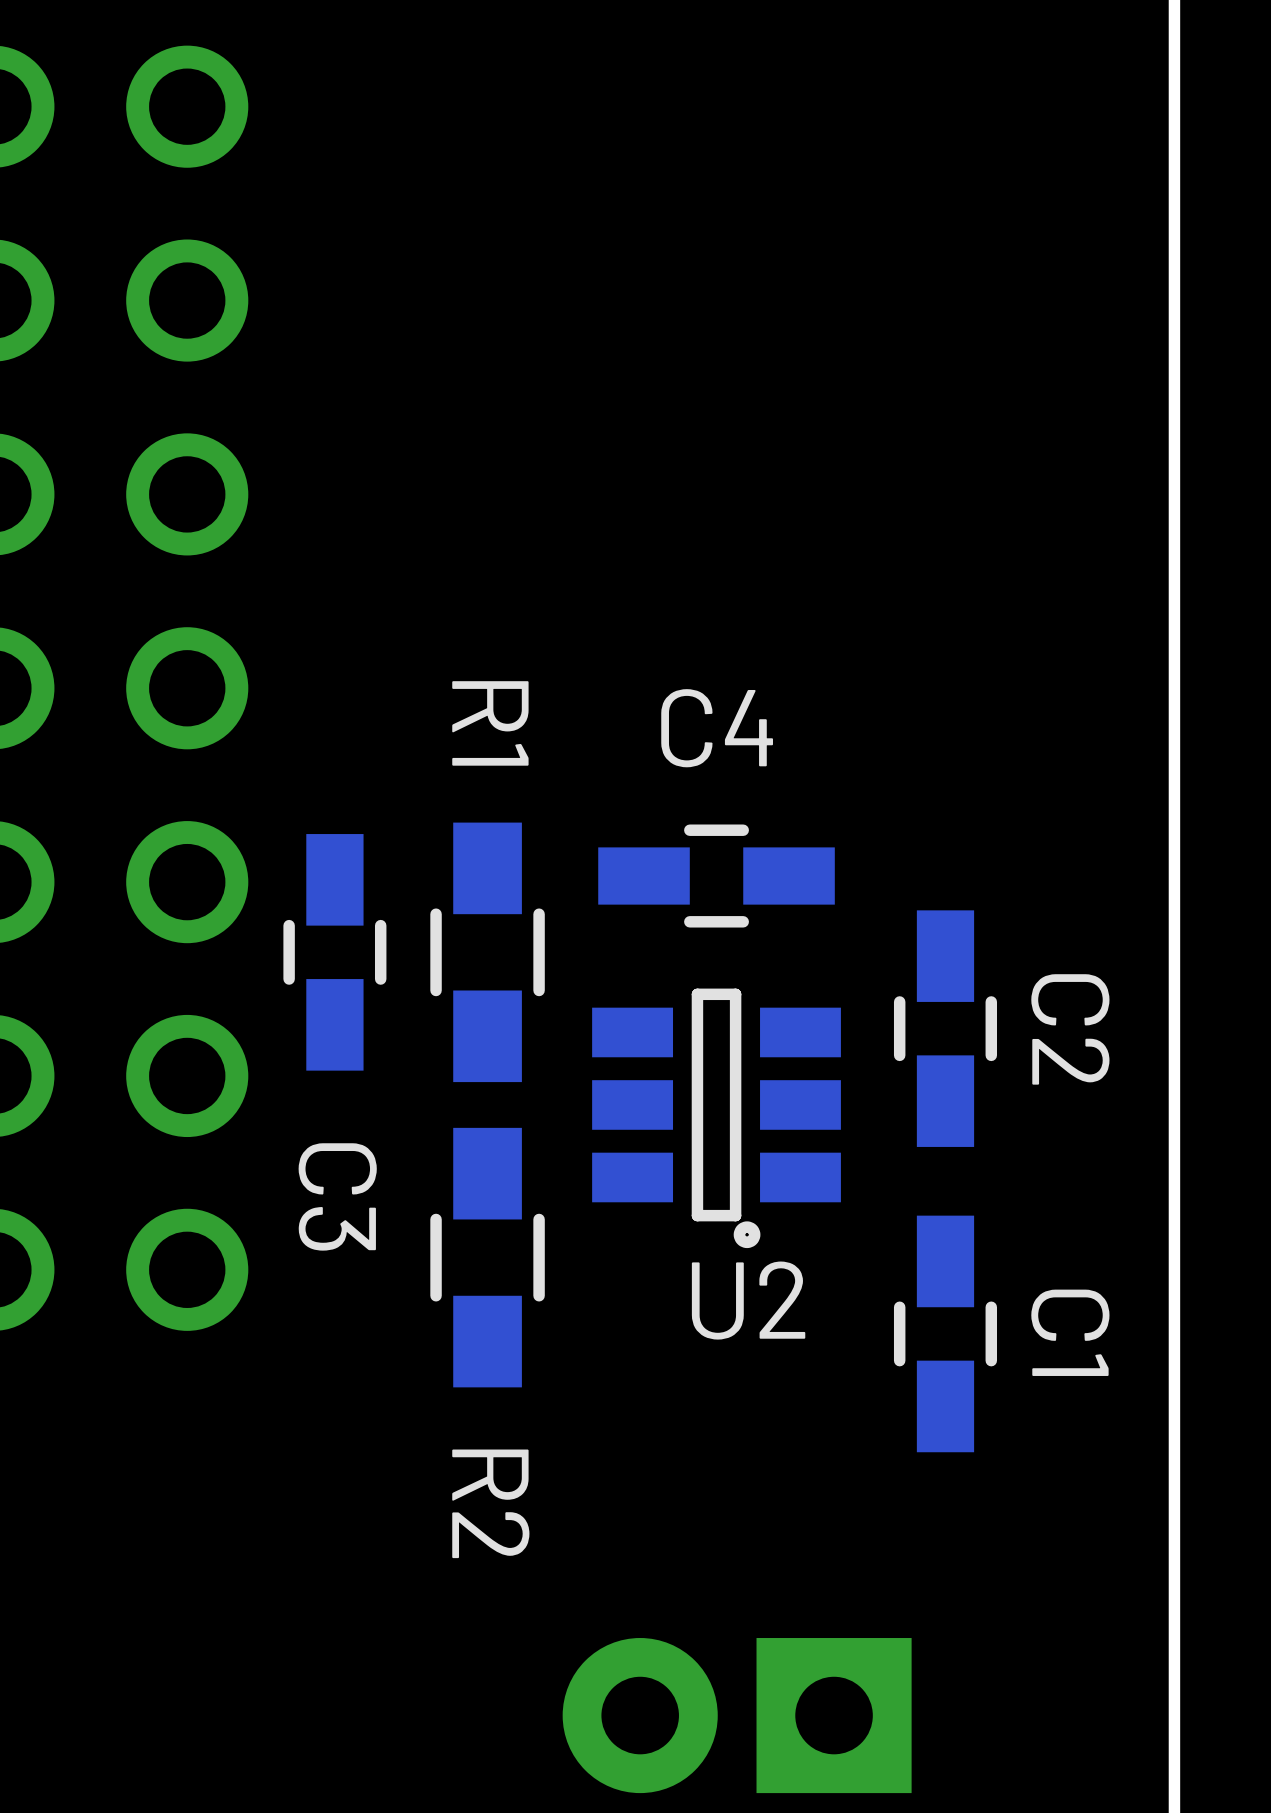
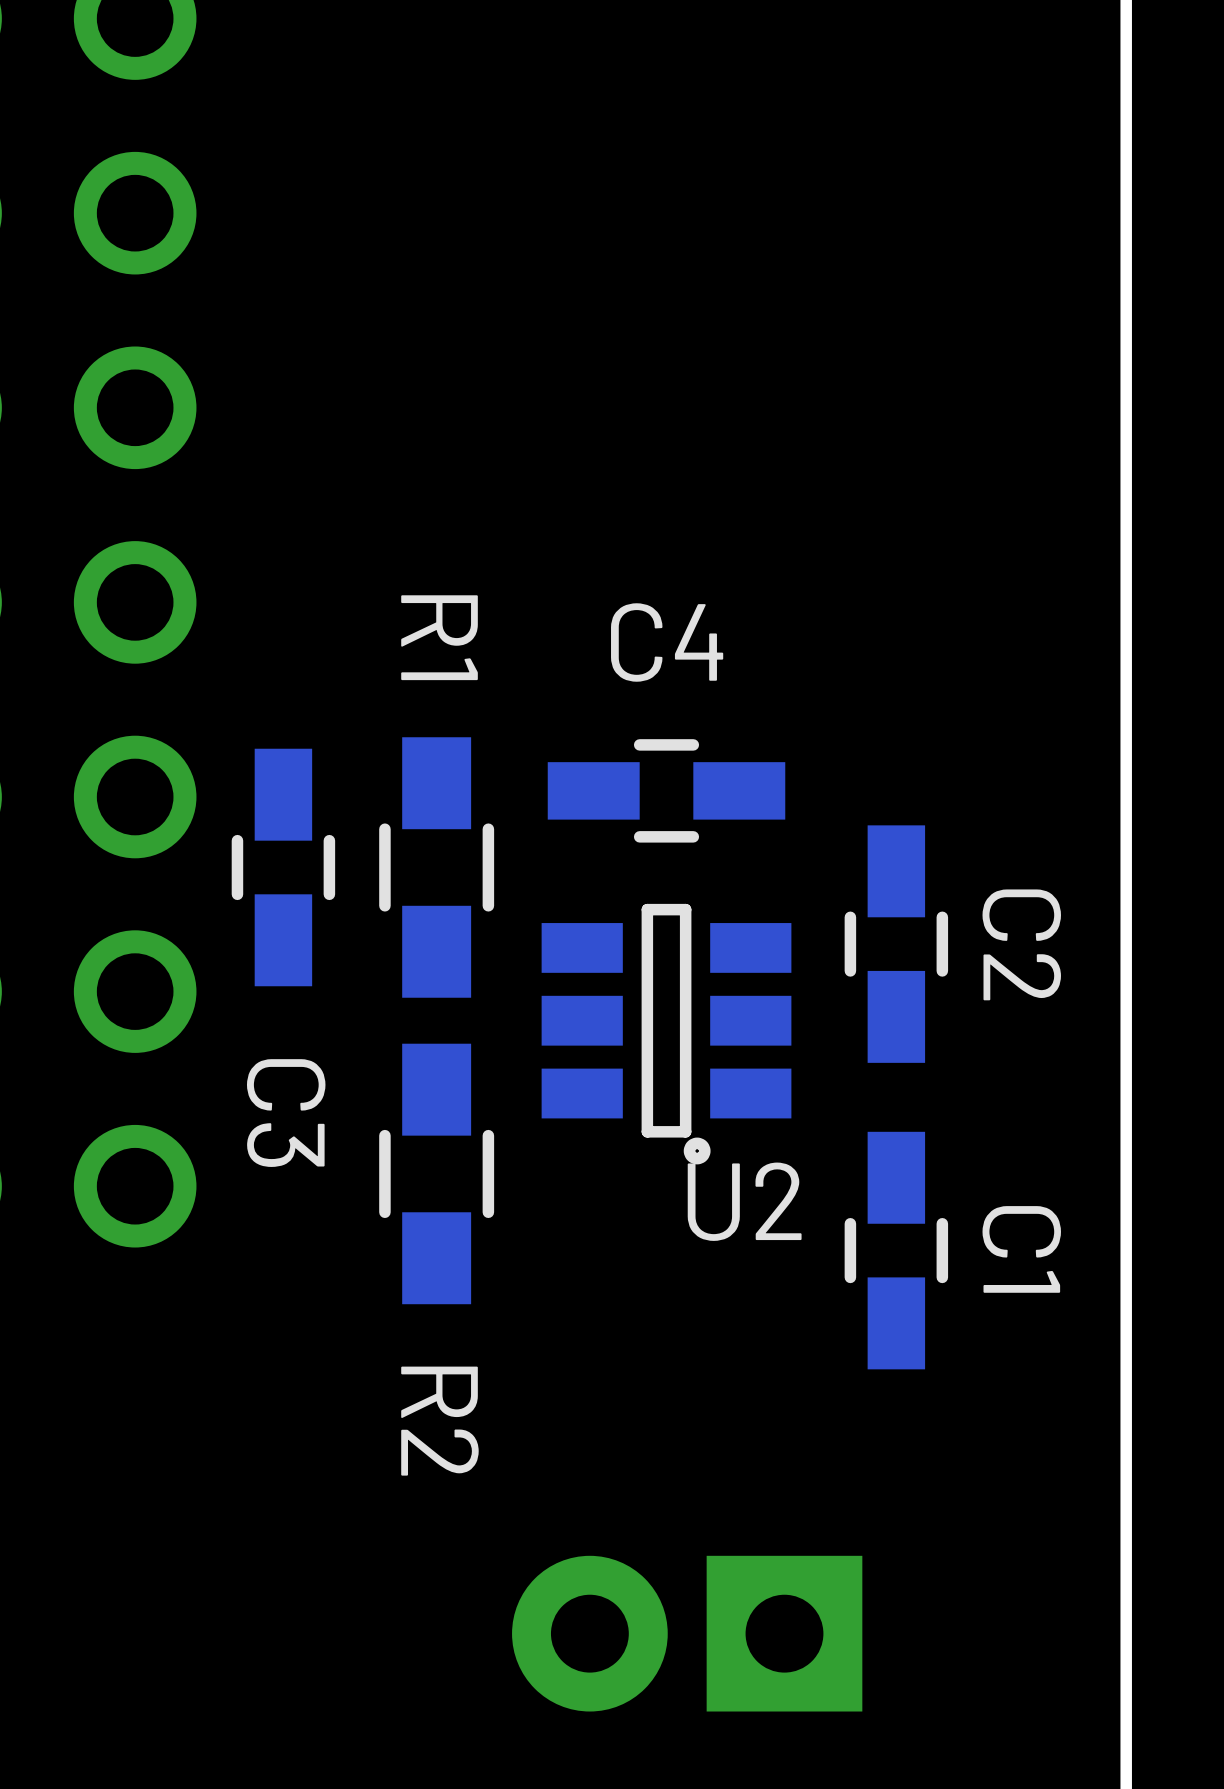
U2 name position: U2 (748, 1300) -> U2 (744, 1201)

